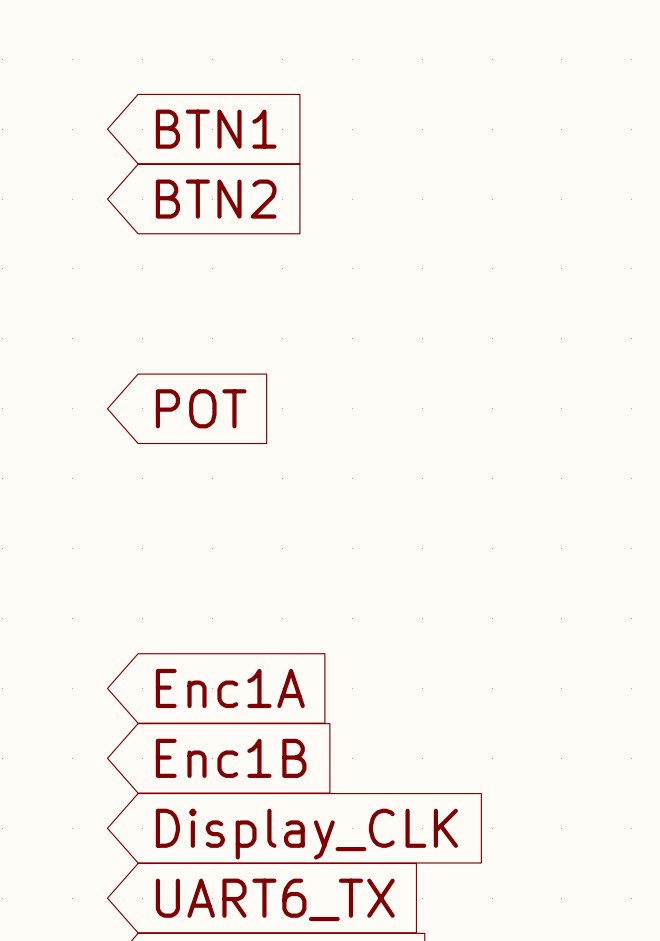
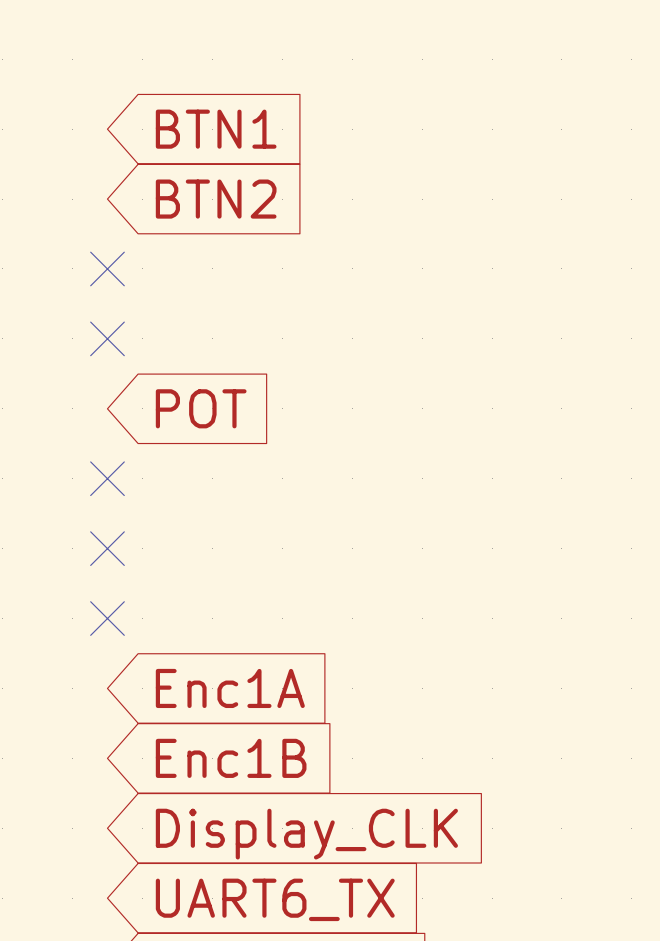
no-connect mark: none -> (107, 268)
no-connect mark: none -> (107, 338)
no-connect mark: none -> (107, 478)
no-connect mark: none -> (107, 548)
no-connect mark: none -> (107, 618)

